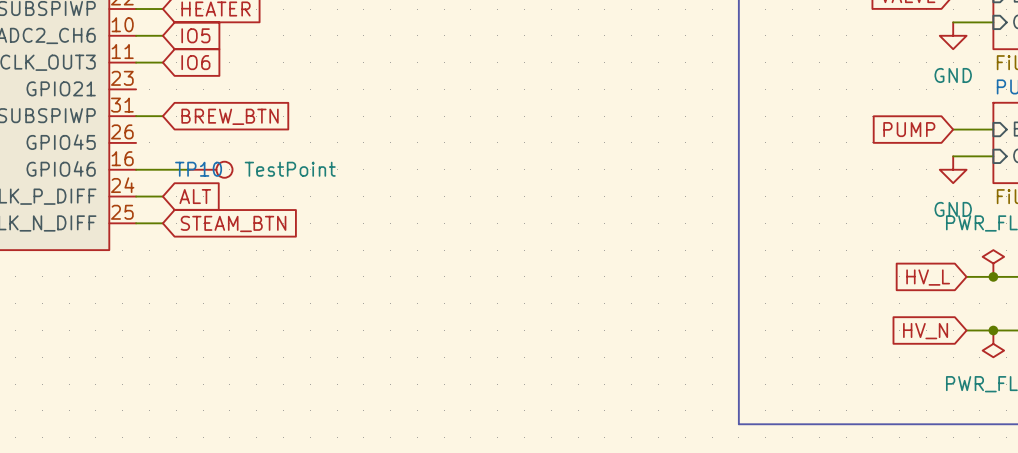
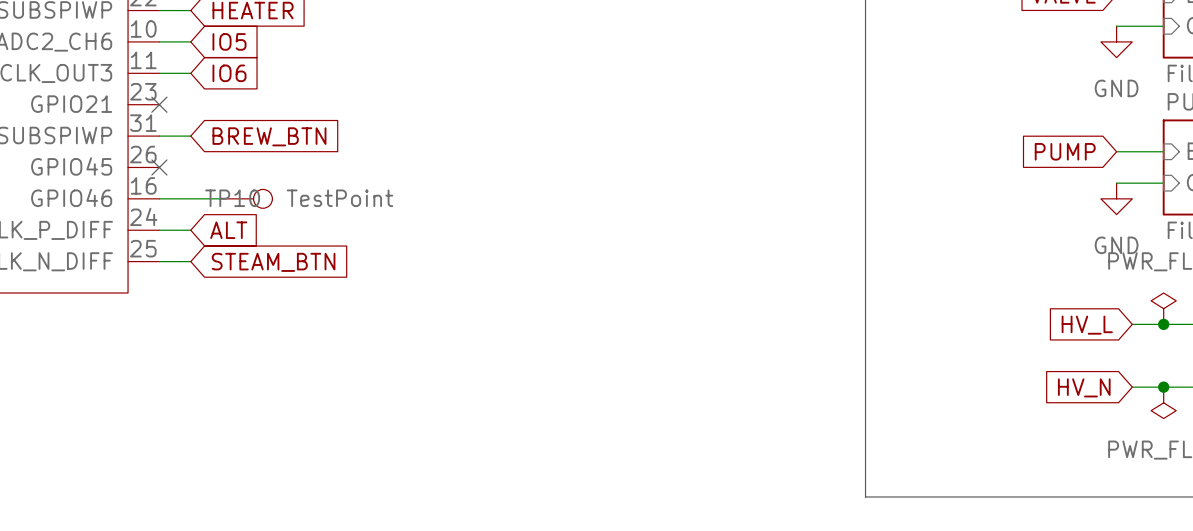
no-connect mark: none -> (159, 104)
no-connect mark: none -> (159, 167)

